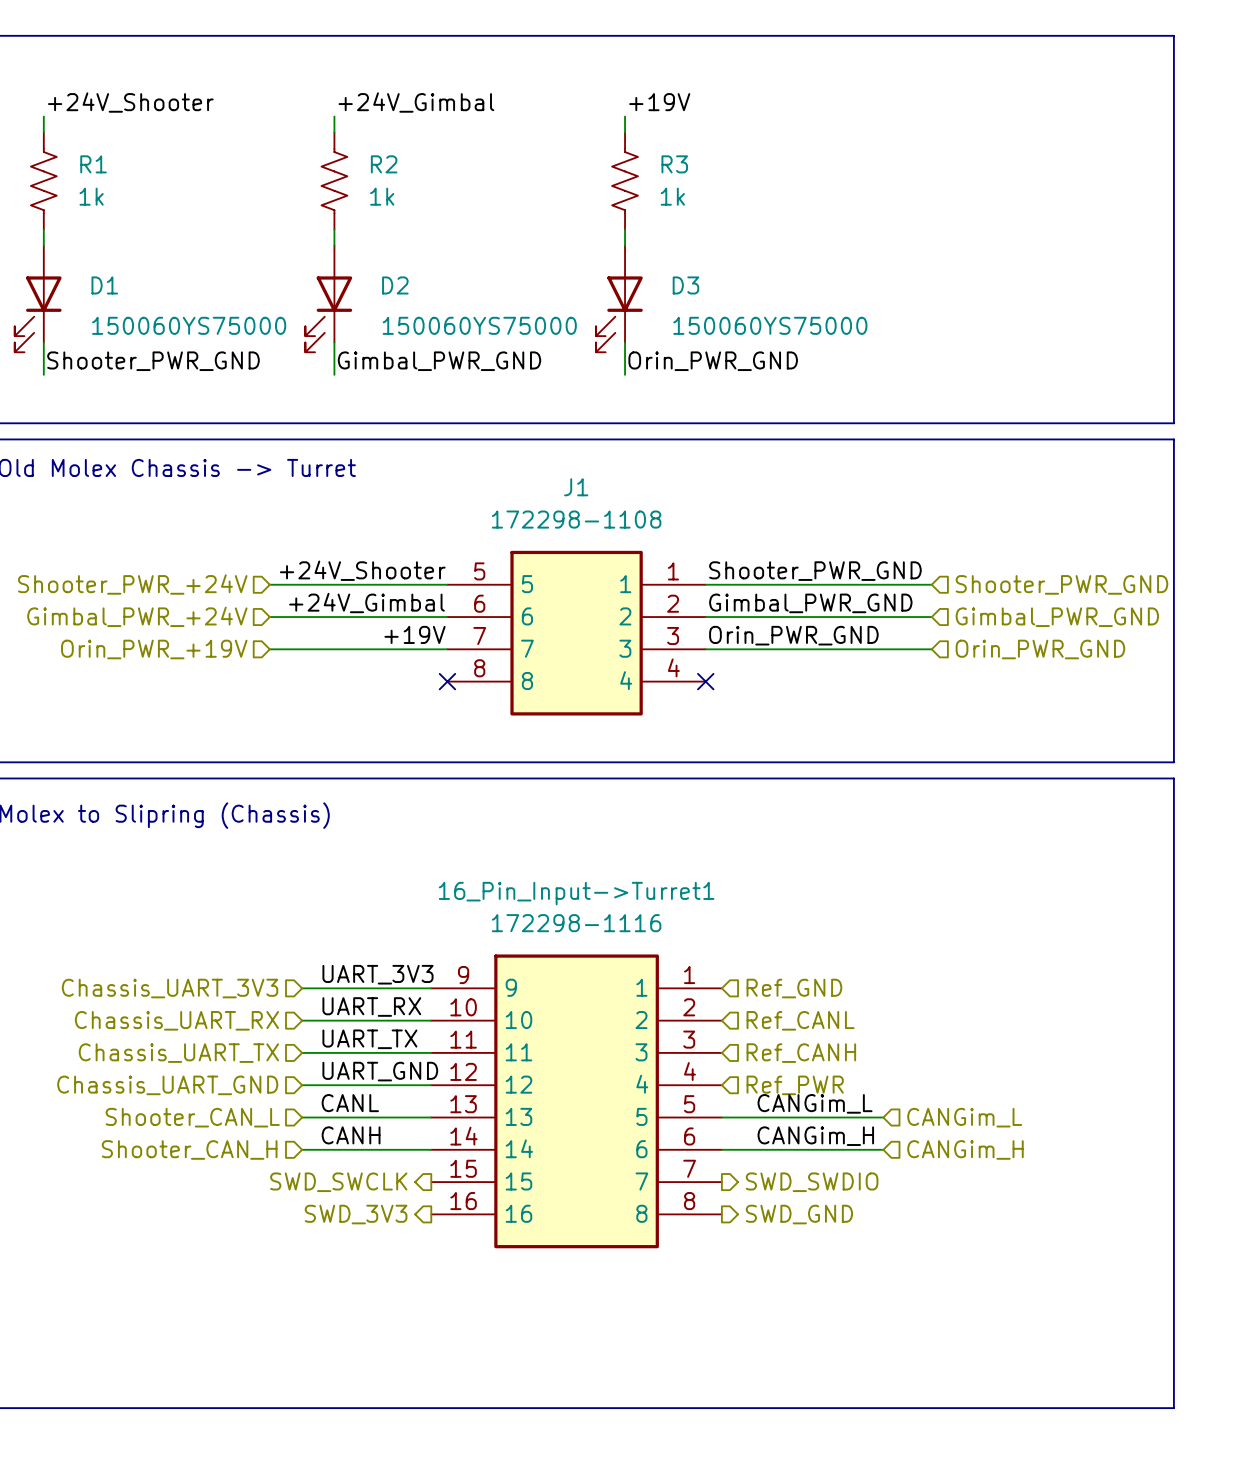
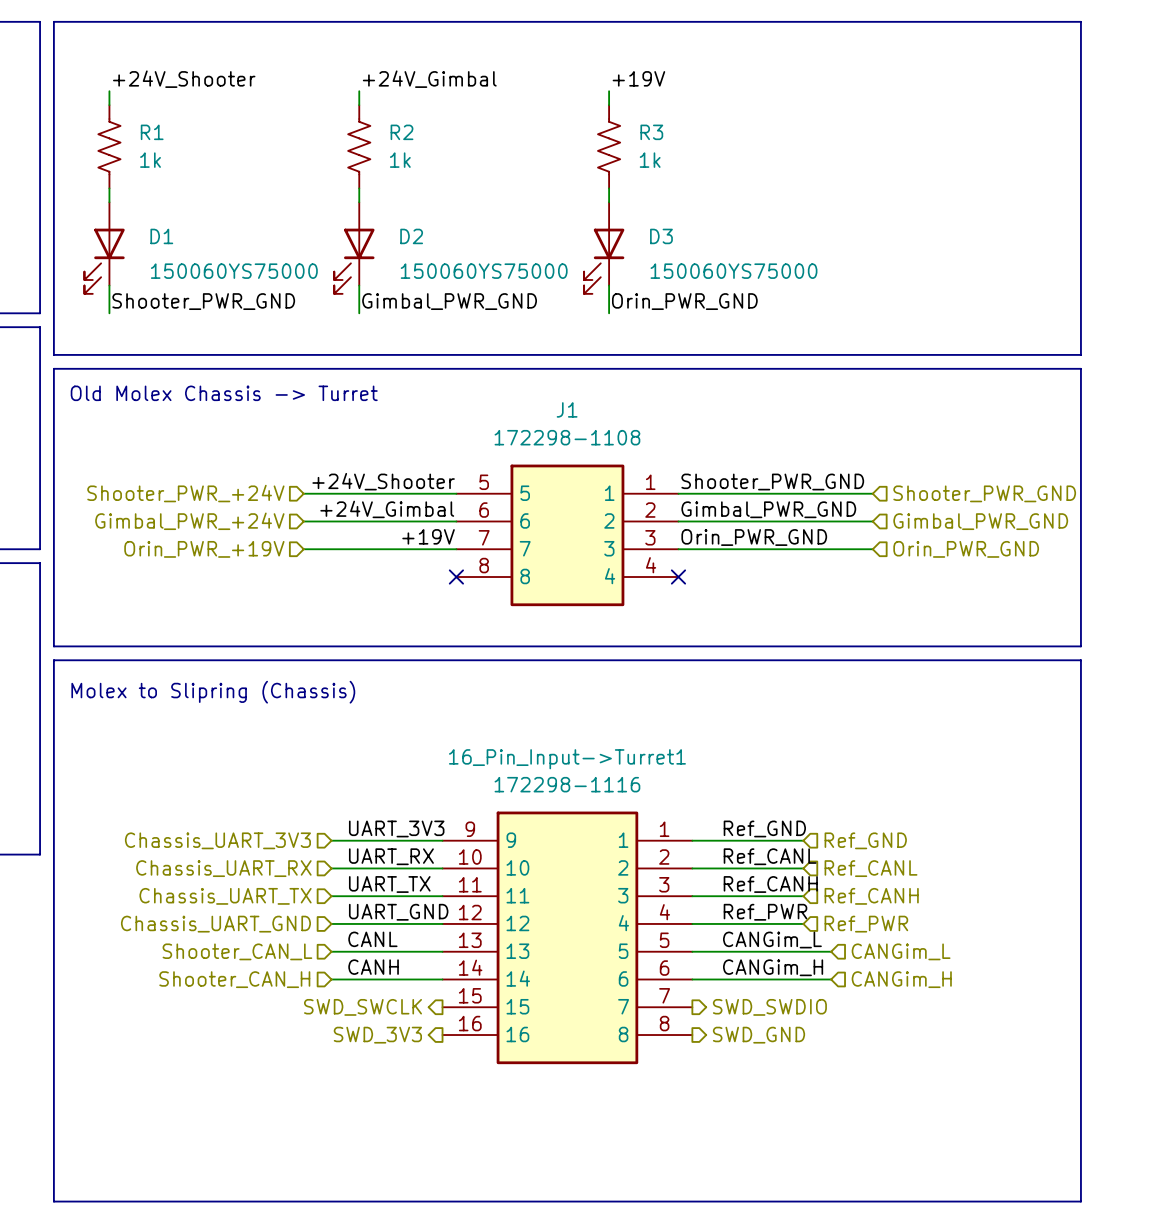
label: none -> Ref_GND (764, 828)
wire: none -> (692, 840) (803, 840)
hierarchical label position: Ref_GND (794, 988) -> Ref_GND (865, 840)
label: none -> Ref_CANL (770, 856)
wire: none -> (692, 868) (803, 868)
hierarchical label position: Ref_CANL (800, 1020) -> Ref_CANL (871, 868)
label: none -> Ref_CANH (770, 884)
wire: none -> (692, 896) (803, 896)
hierarchical label position: Ref_CANH (801, 1053) -> Ref_CANH (871, 896)
label: none -> Ref_PWR (765, 912)
wire: none -> (692, 923) (803, 923)
hierarchical label position: Ref_PWR (795, 1085) -> Ref_PWR (866, 924)

